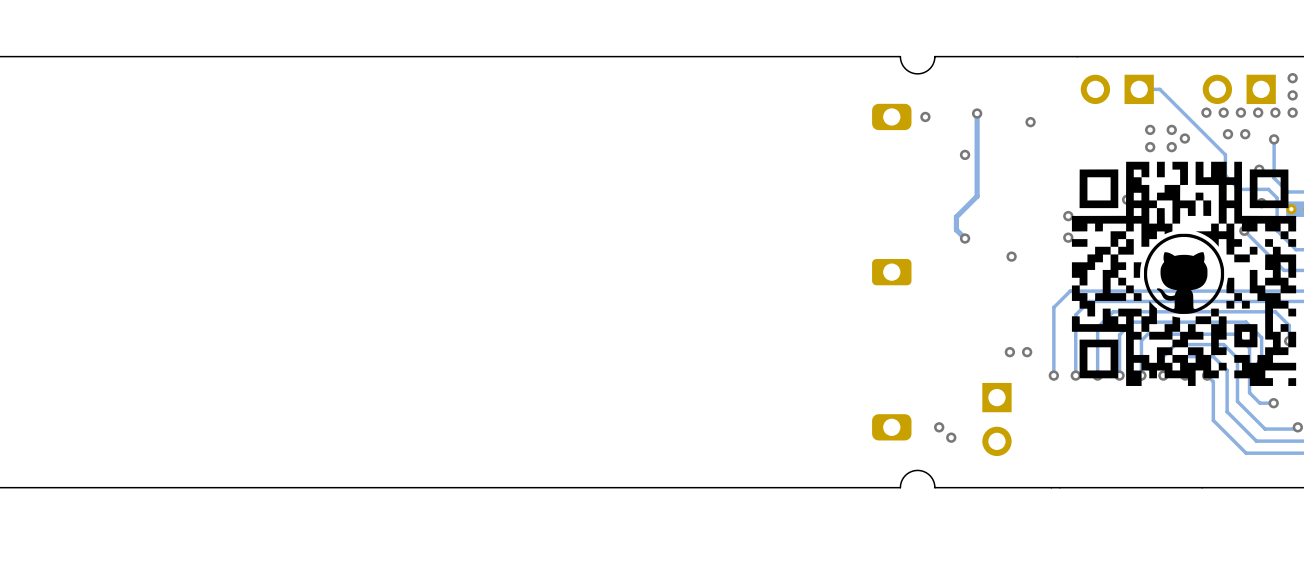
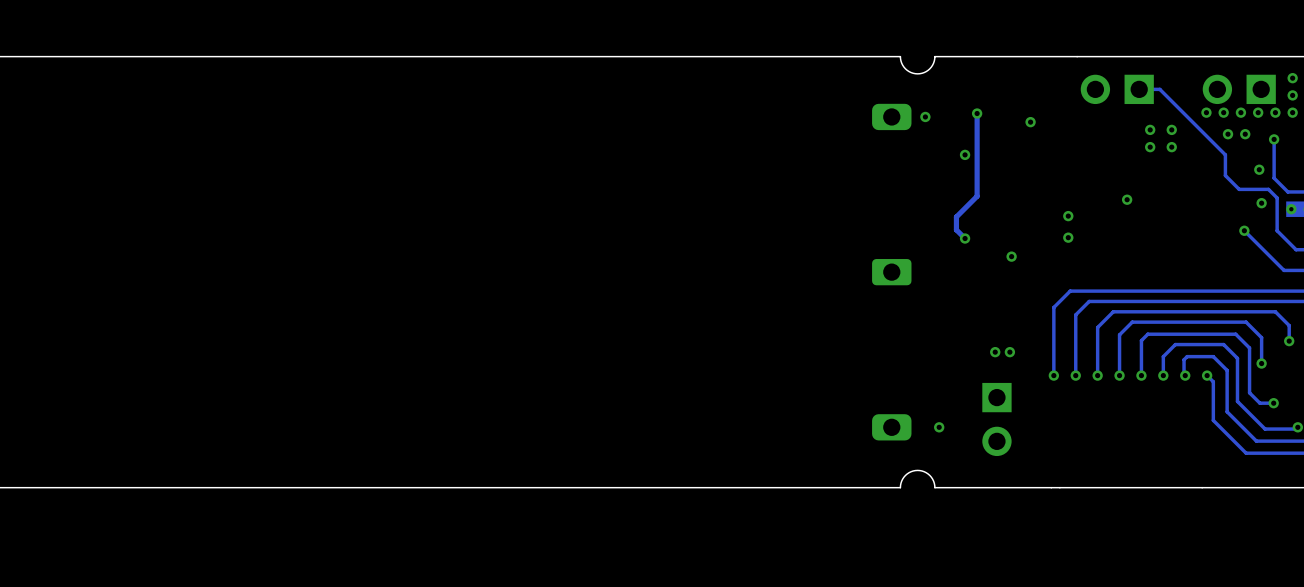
via: (1184, 138) -> none
drawing: [1071, 161, 1297, 386] -> none
via position: (1027, 352) -> (995, 352)
via: (951, 437) -> none

